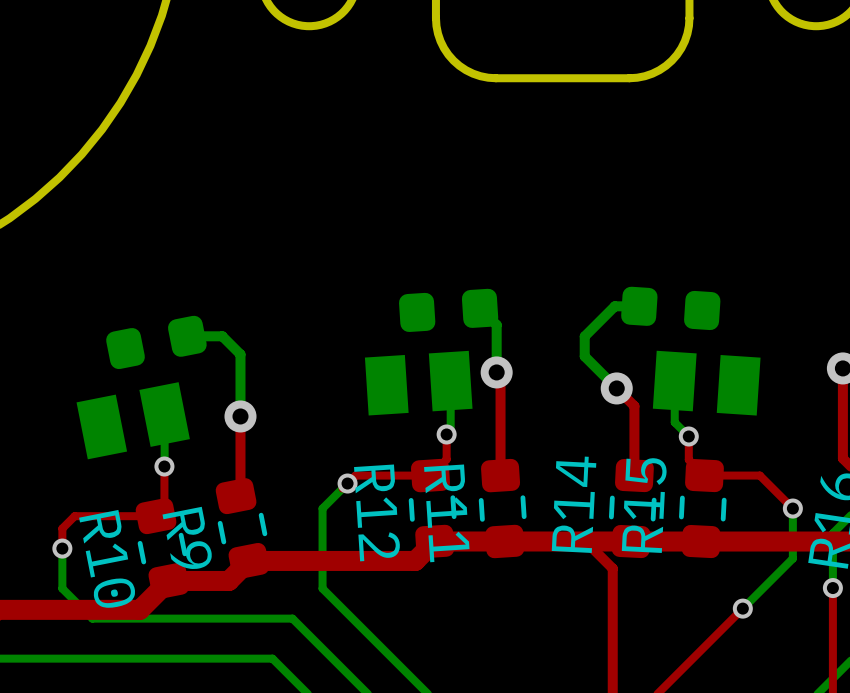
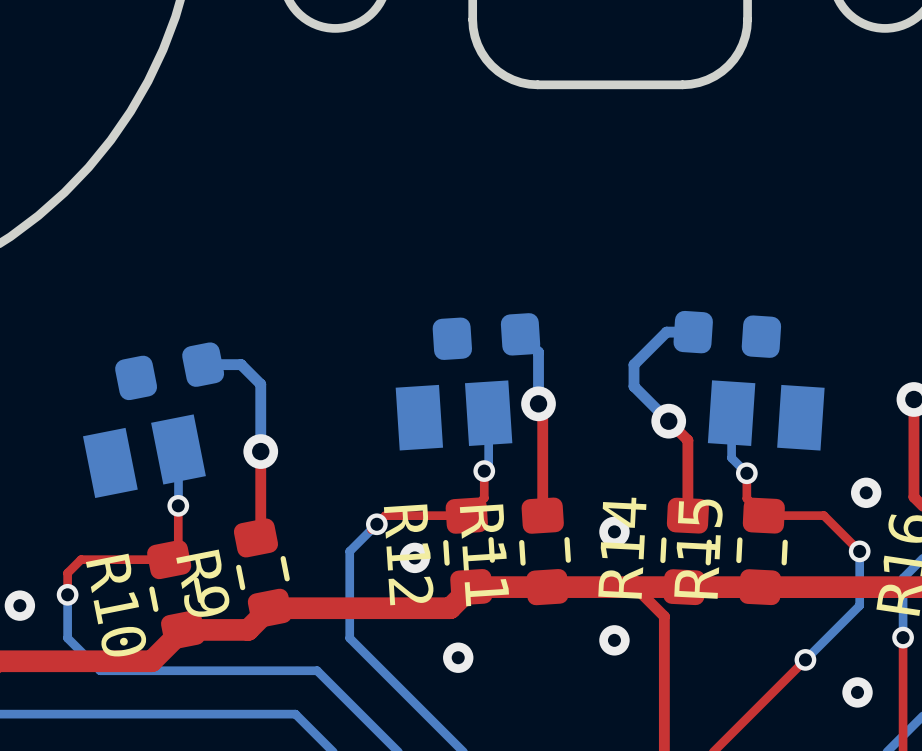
via: none -> (866, 492)
via: none -> (614, 531)
via: none -> (414, 557)
via: none -> (19, 605)
via: none -> (614, 640)
via: none -> (458, 657)
via: none -> (857, 692)

